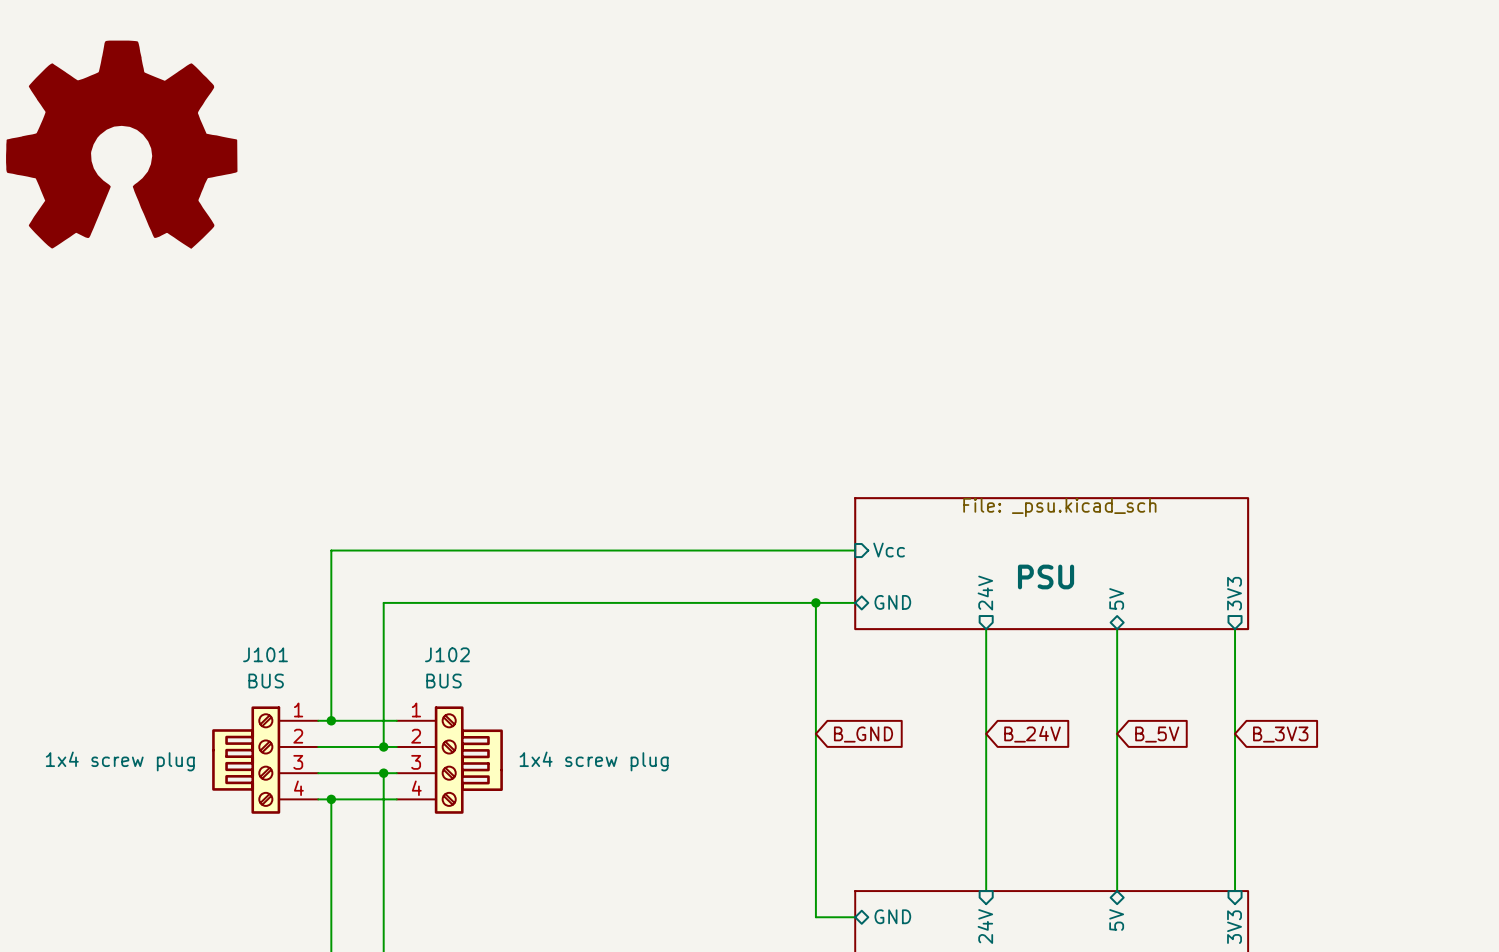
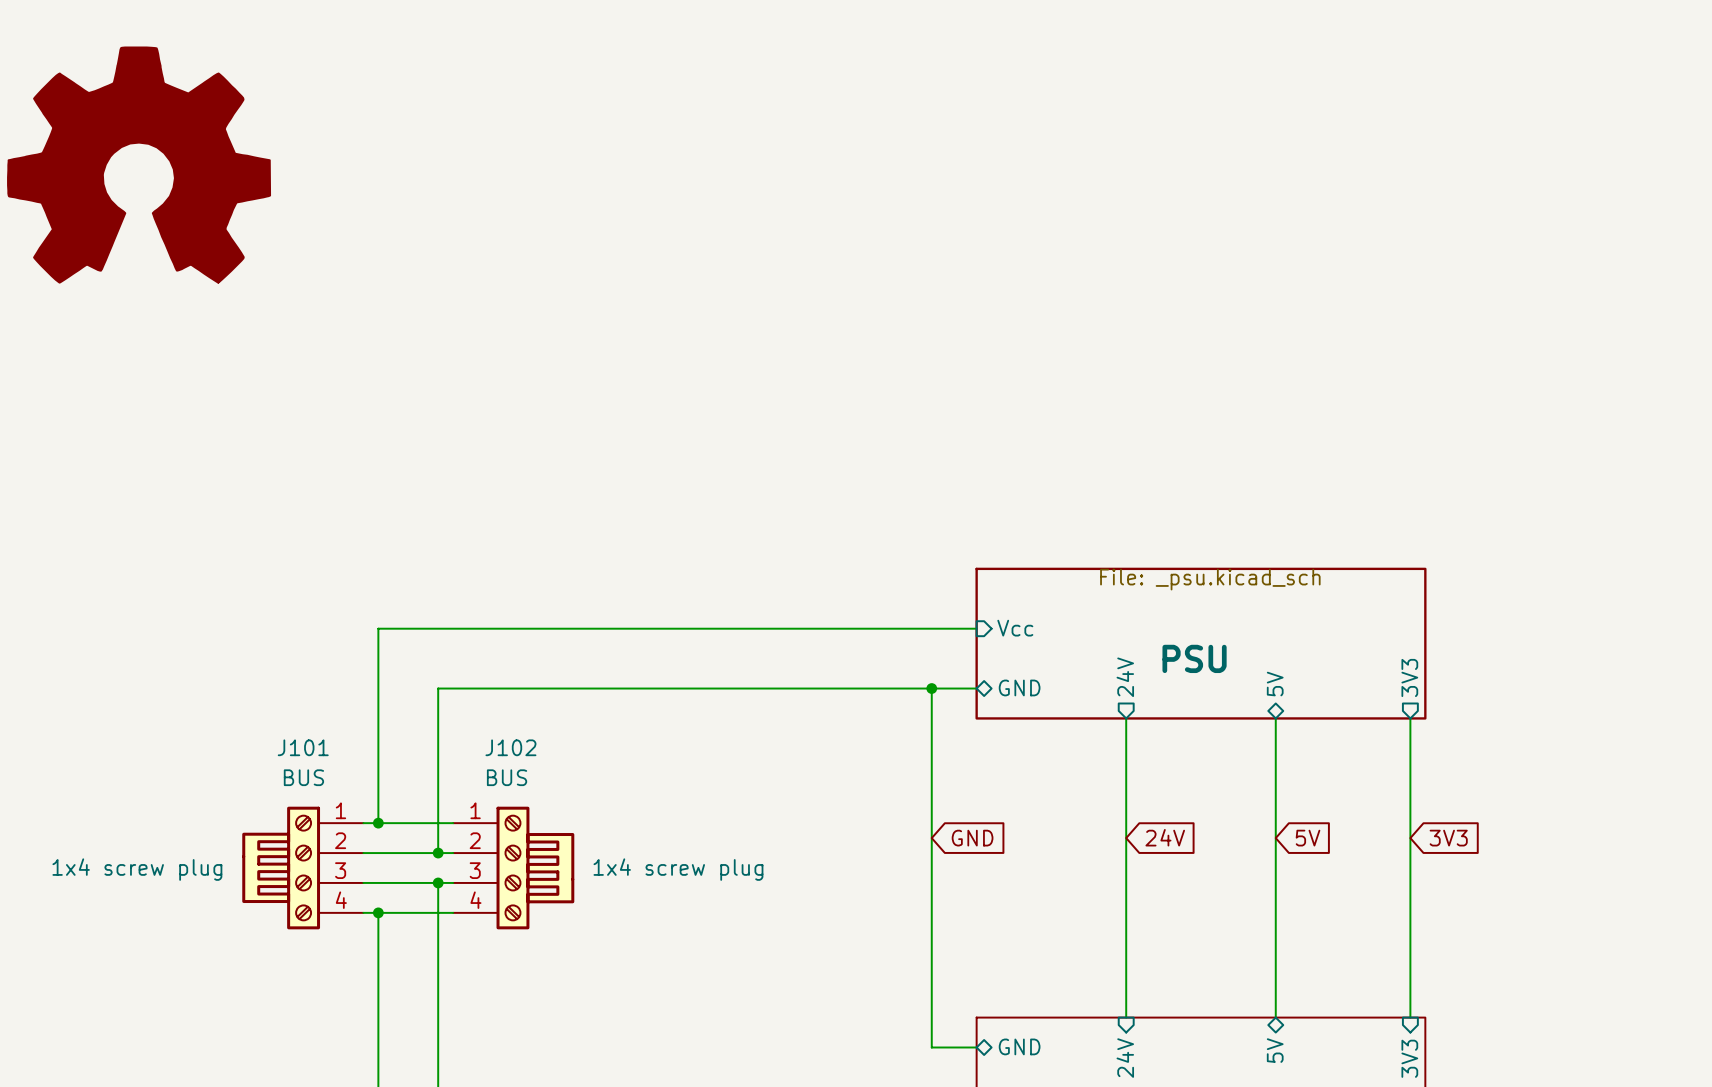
global label: B_GND (863, 734) -> GND (972, 838)
global label: B_24V (1032, 734) -> 24V (1165, 837)
global label: B_5V (1157, 734) -> 5V (1308, 838)
global label: B_3V3 (1280, 734) -> 3V3 (1448, 838)

